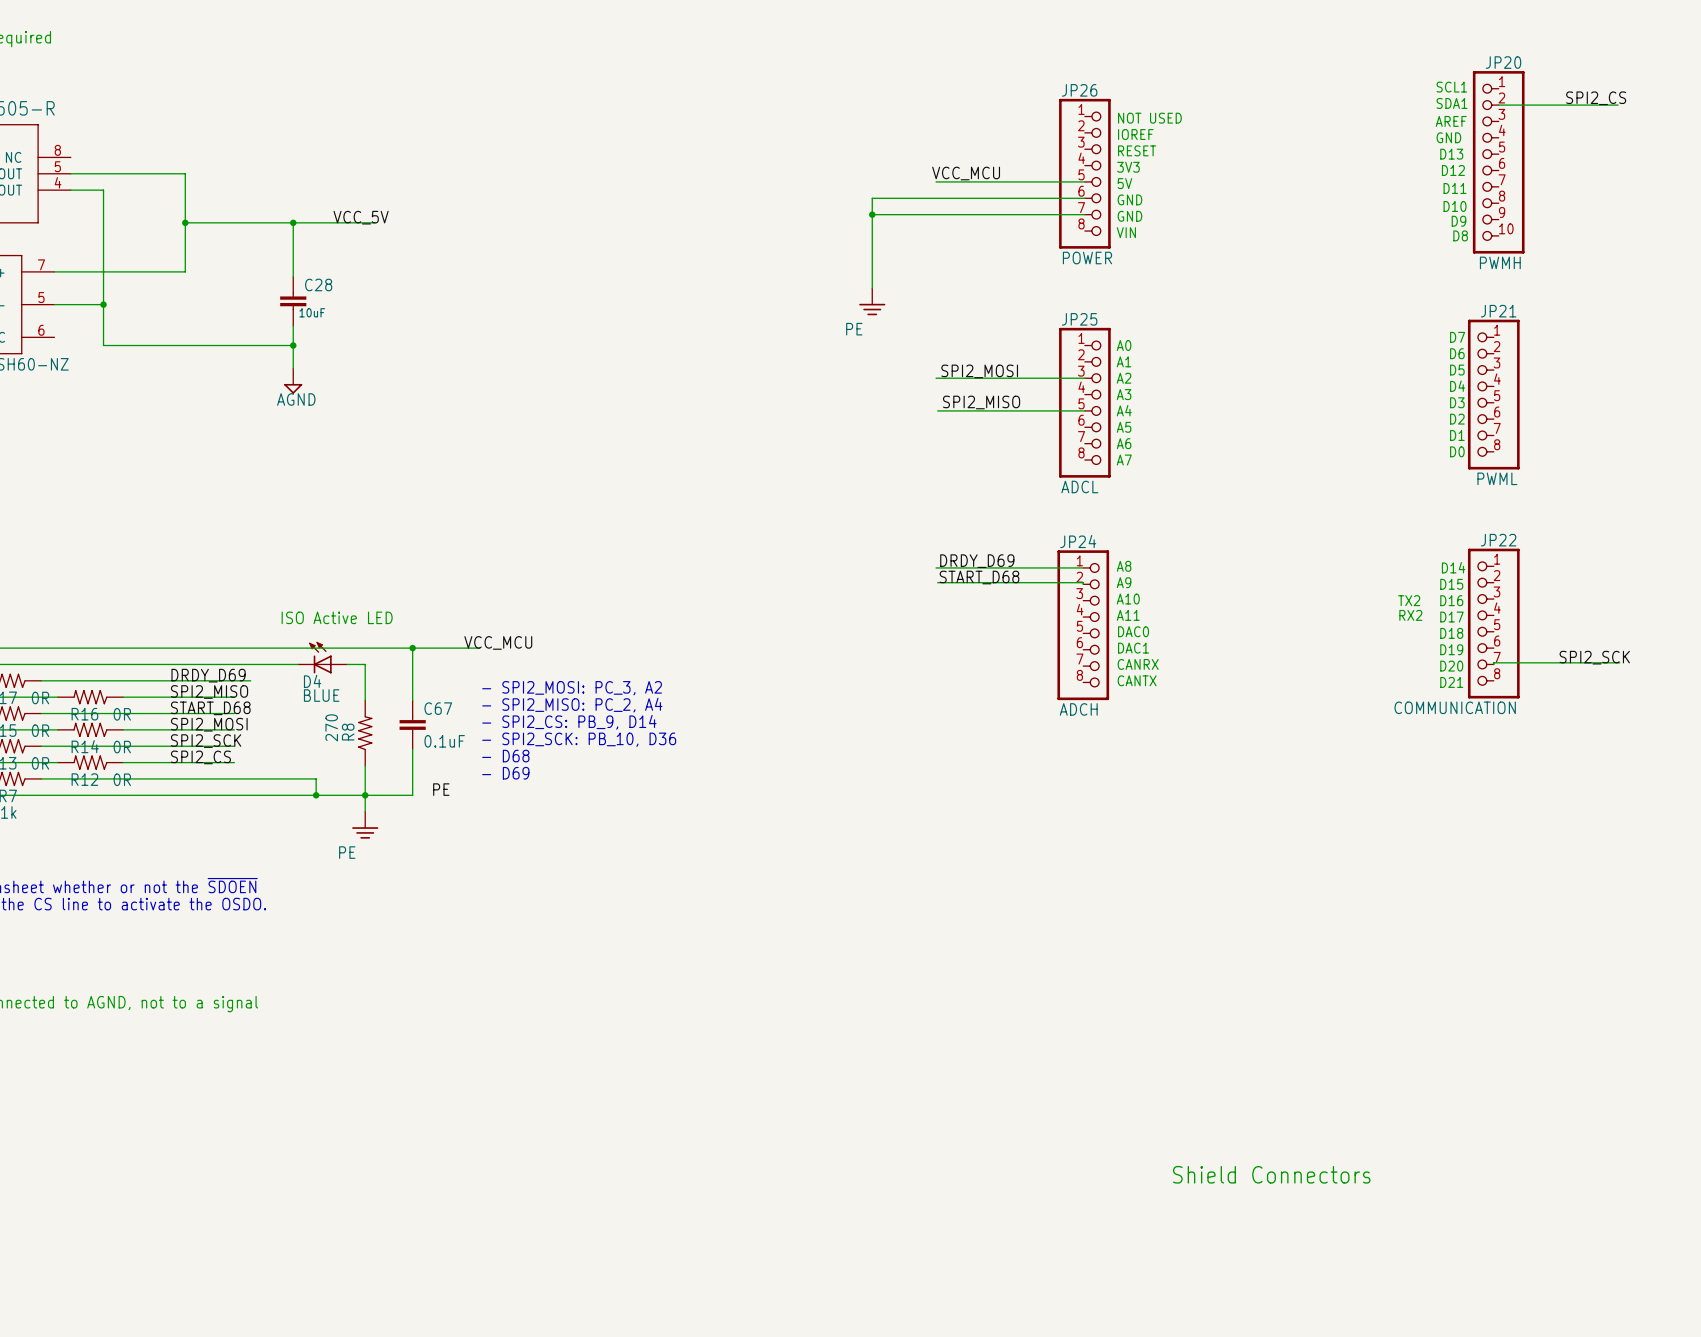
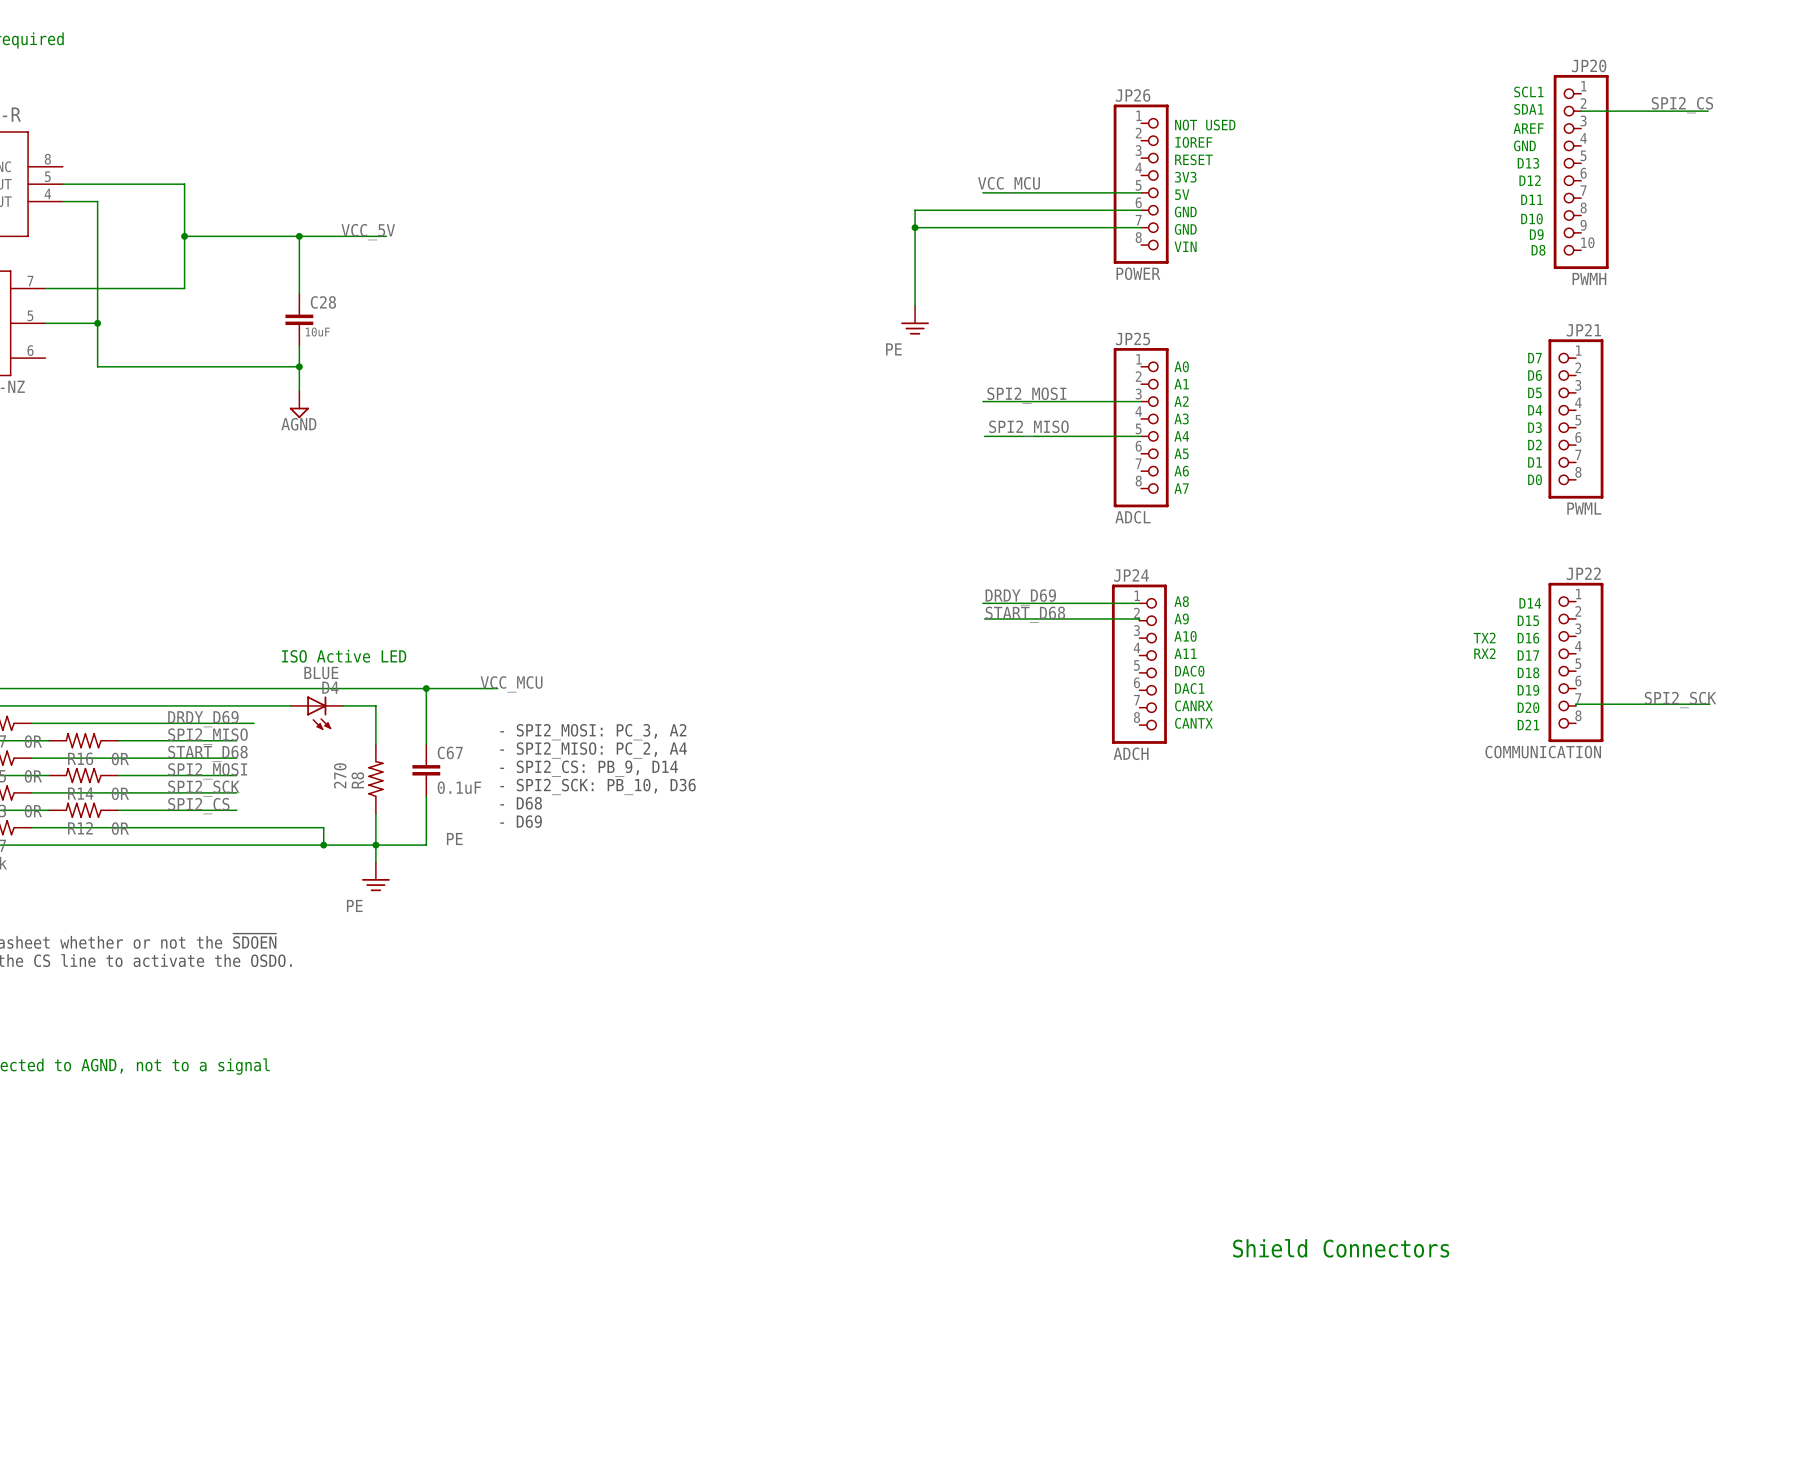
D4 rotation: 0° (320, 657) -> 180° (319, 713)

